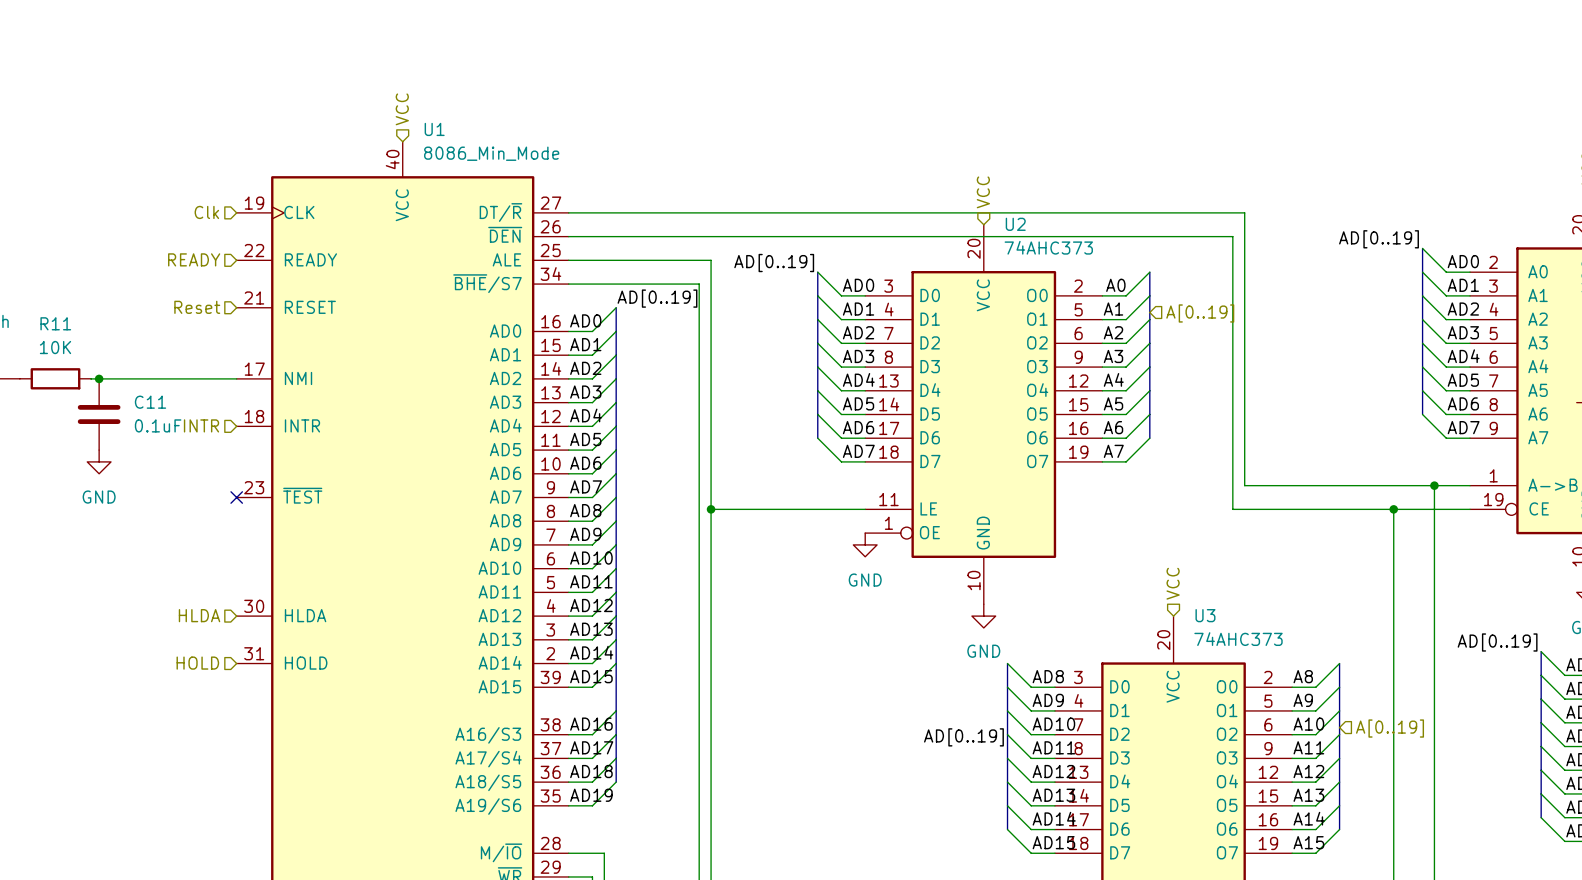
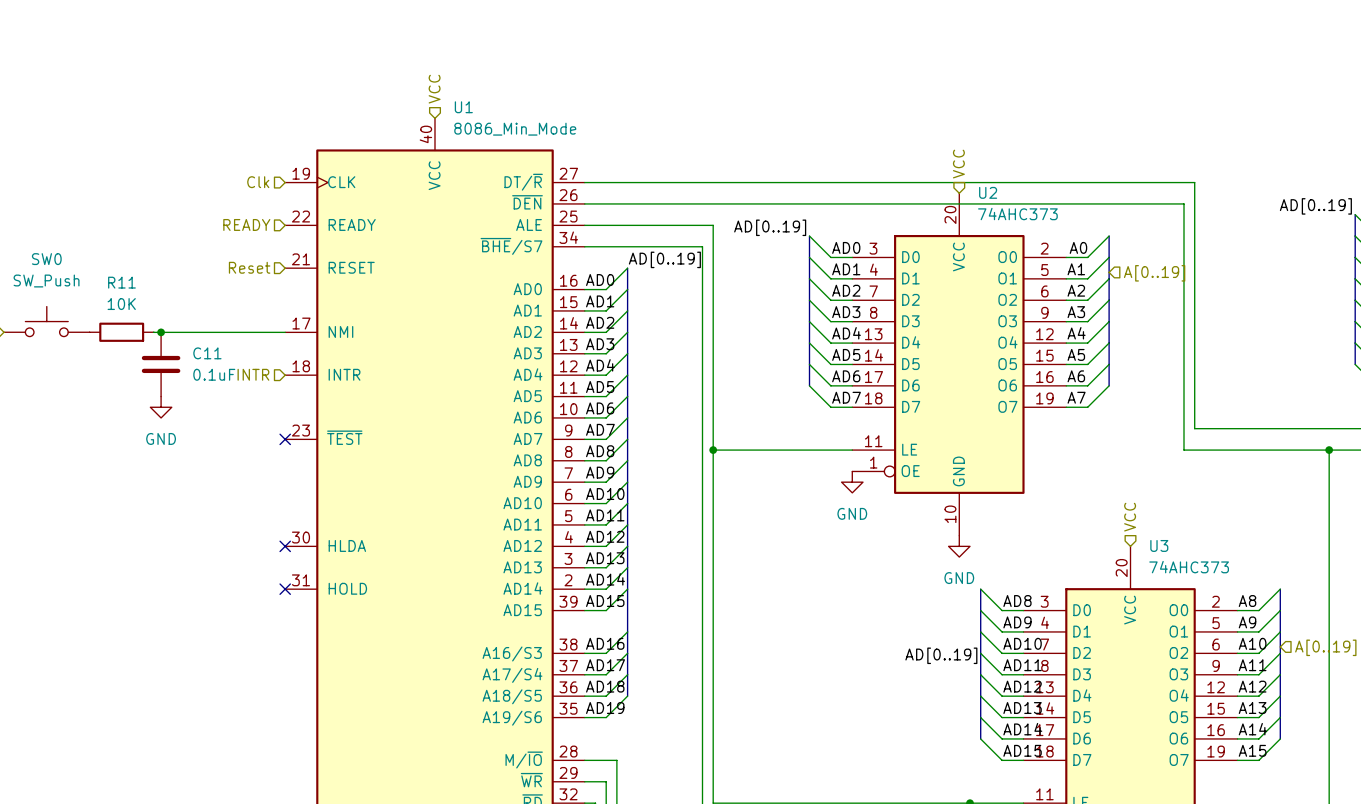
hierarchical label: HLDA (199, 615) -> none
no-connect mark: none -> (285, 546)
hierarchical label: HOLD (197, 663) -> none
no-connect mark: none -> (285, 589)

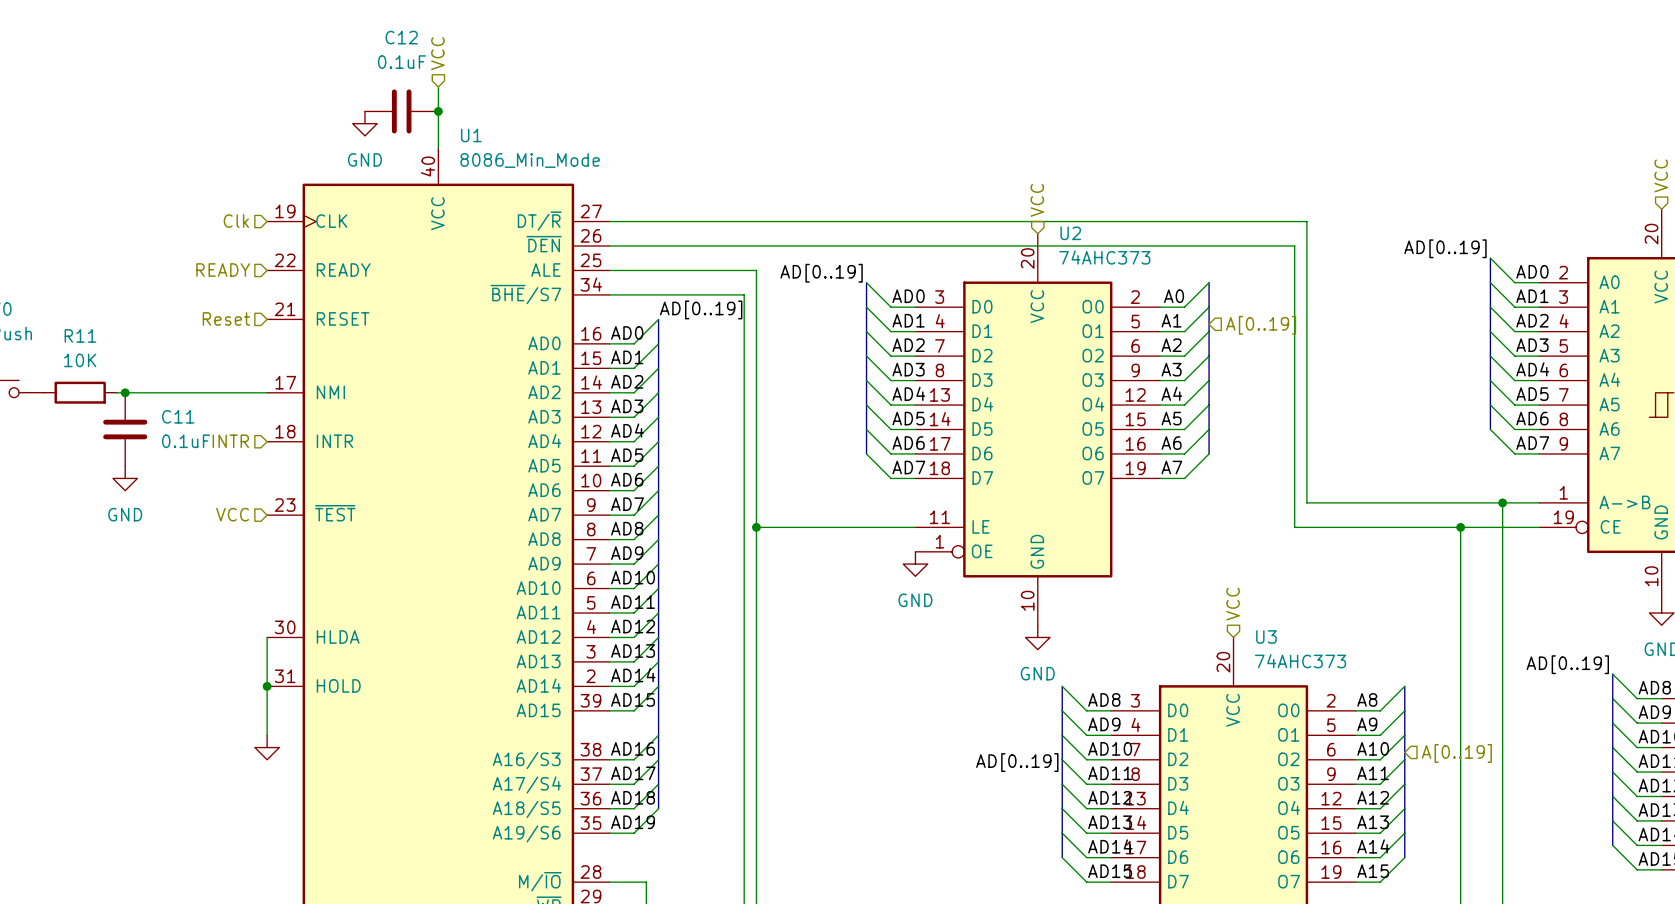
wire: none -> (438, 86) (438, 148)
C12: none -> 0.1uF (401, 111)
junction: none -> (438, 111)
hierarchical label position: VCC (434, 89) -> VCC (437, 53)
power symbol: none -> GND (364, 123)
hierarchical label: none -> VCC (232, 514)
no-connect mark: (285, 439) -> none
wire: none -> (267, 637) (267, 735)
no-connect mark: (285, 546) -> none
no-connect mark: (285, 589) -> none
junction: none -> (267, 686)
power symbol: none -> (267, 747)

